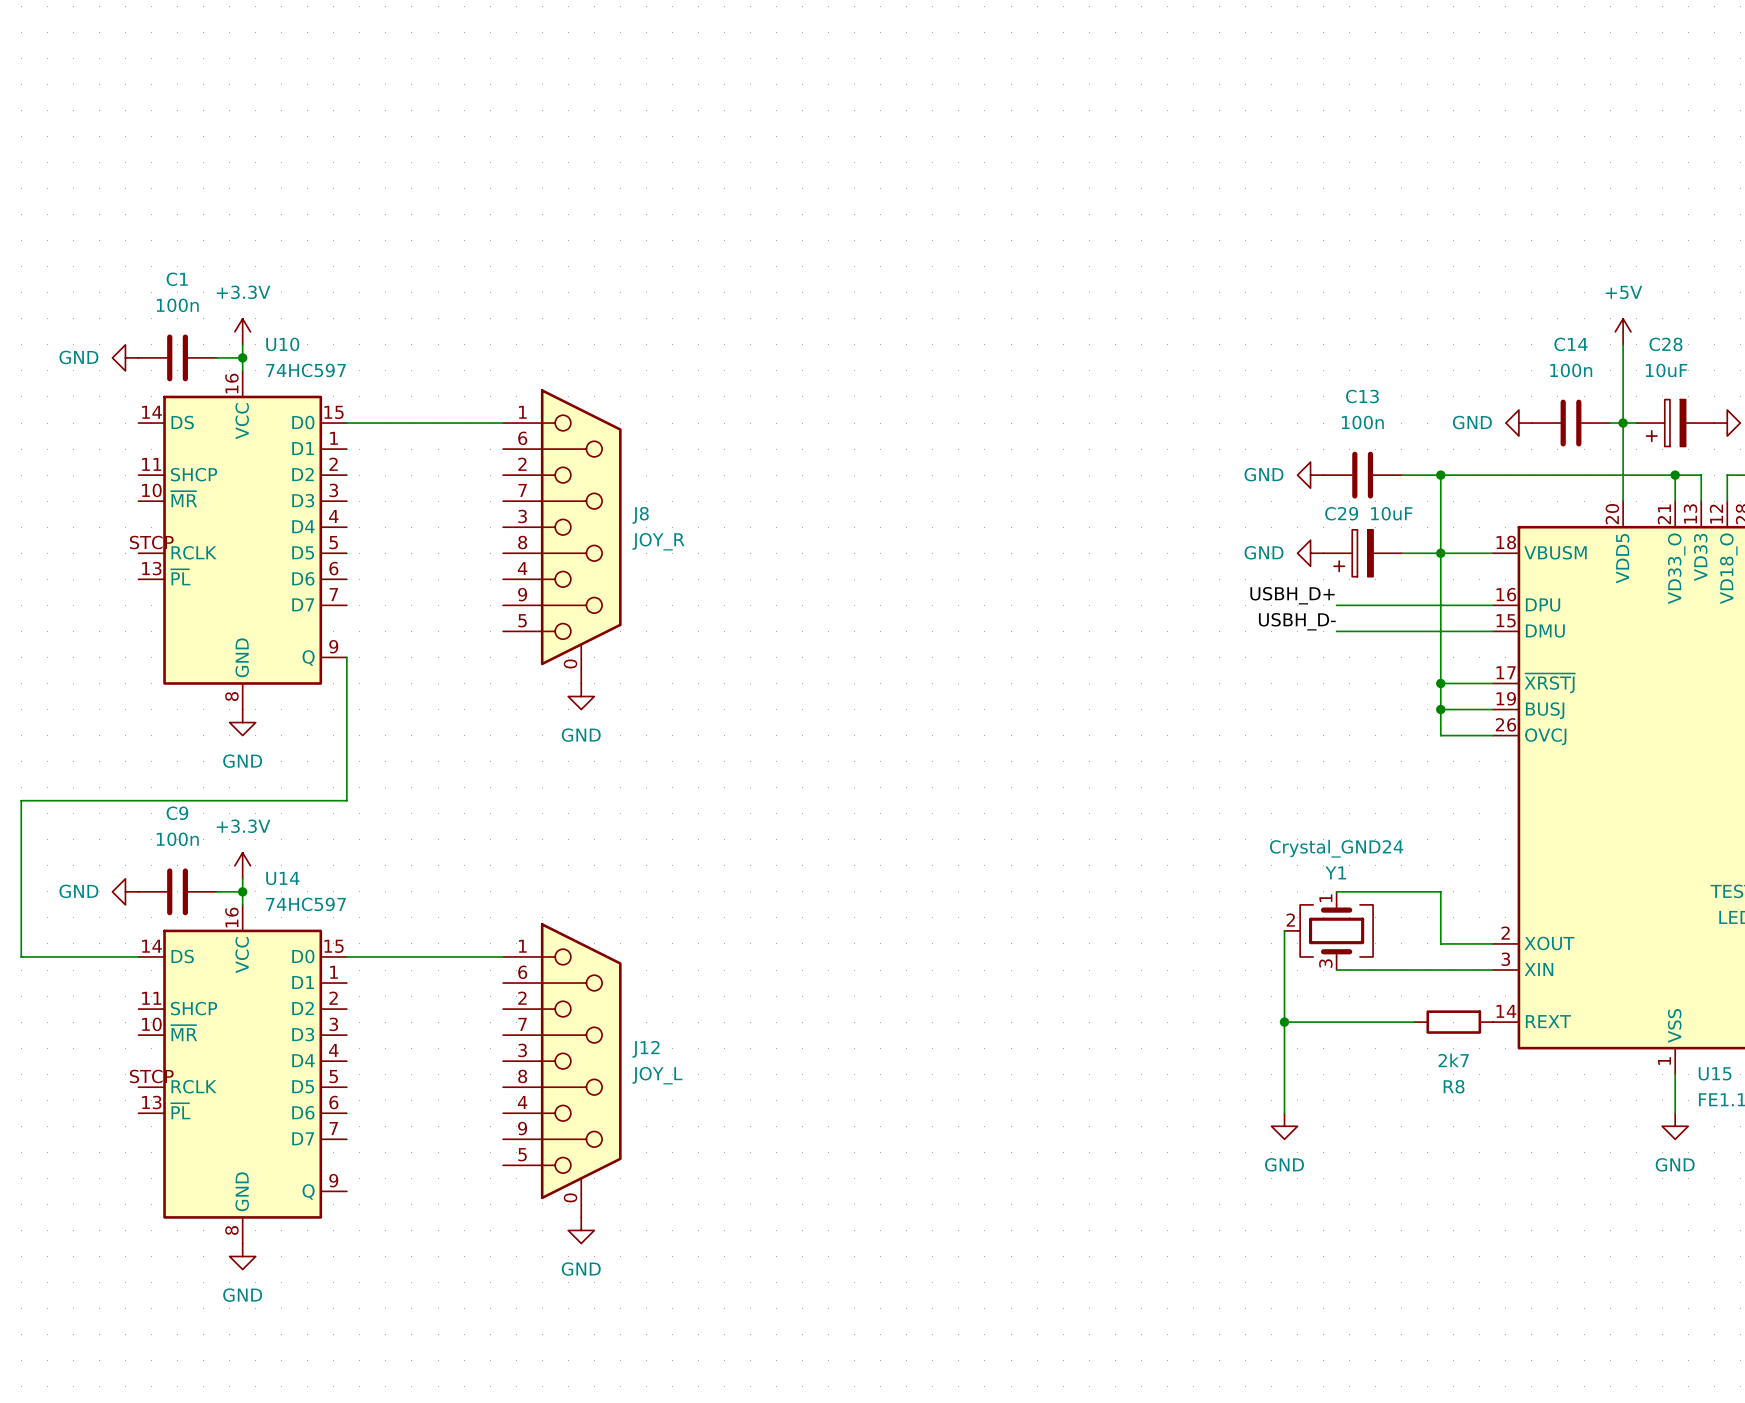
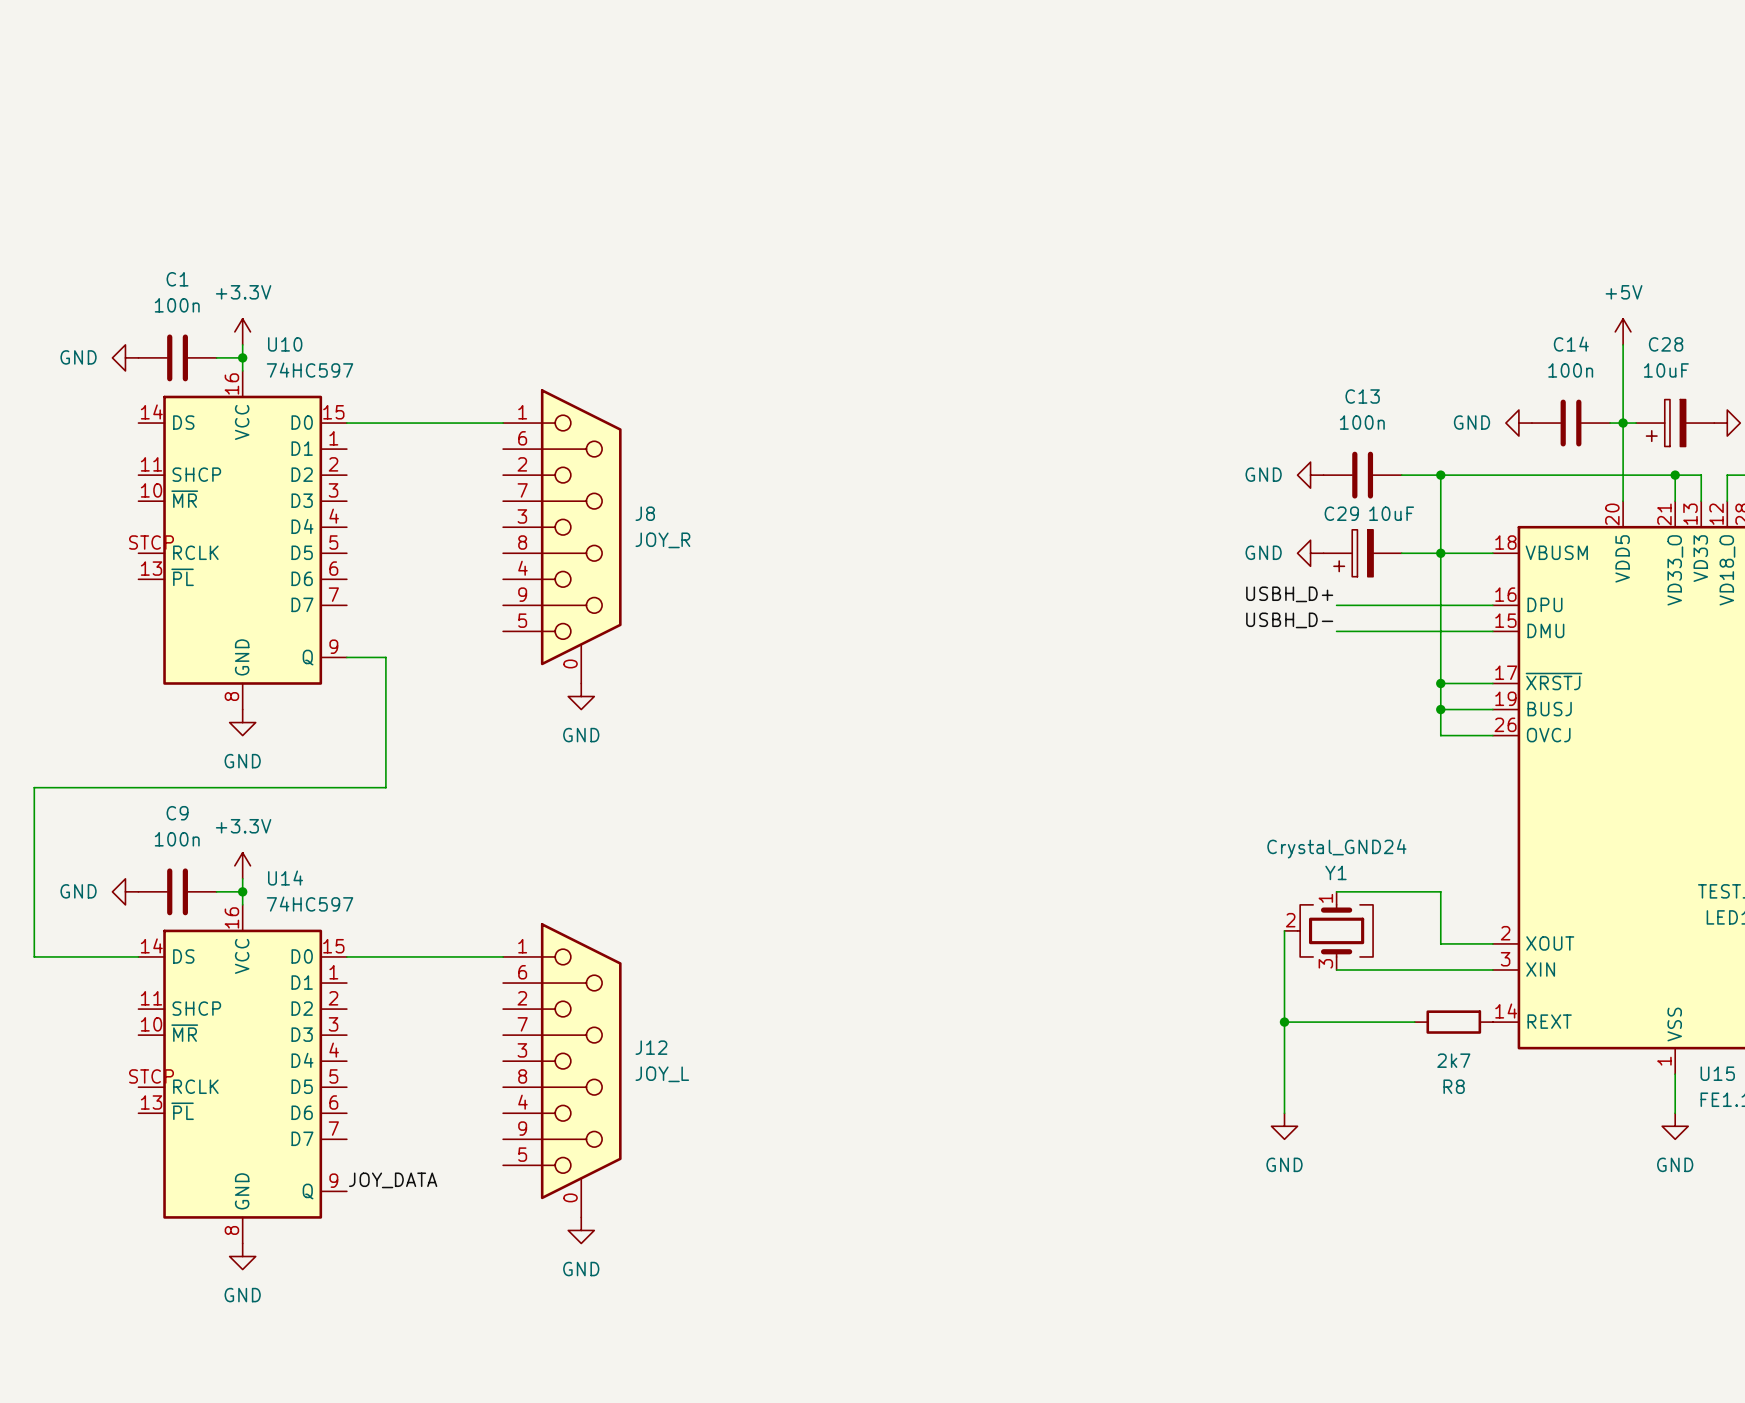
wire: (346, 657) (346, 800) (21, 800) (21, 956) (34, 956) -> (346, 657) (385, 657) (385, 787) (34, 787) (34, 956)
label: none -> JOY_DATA (393, 1180)

